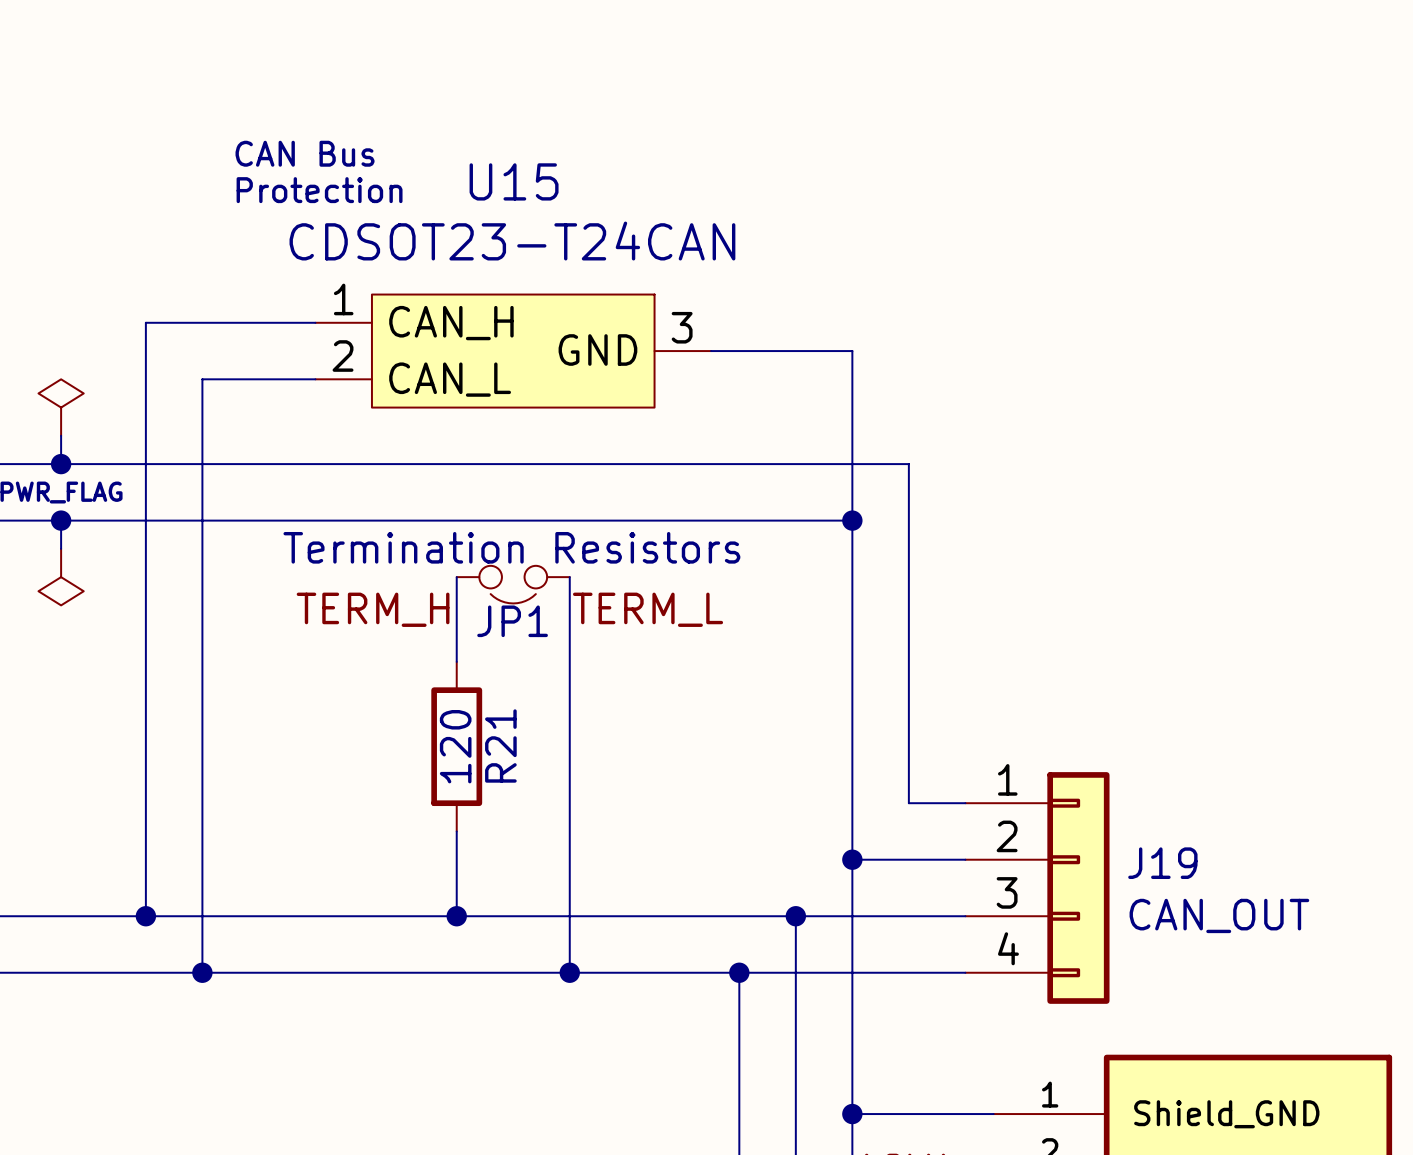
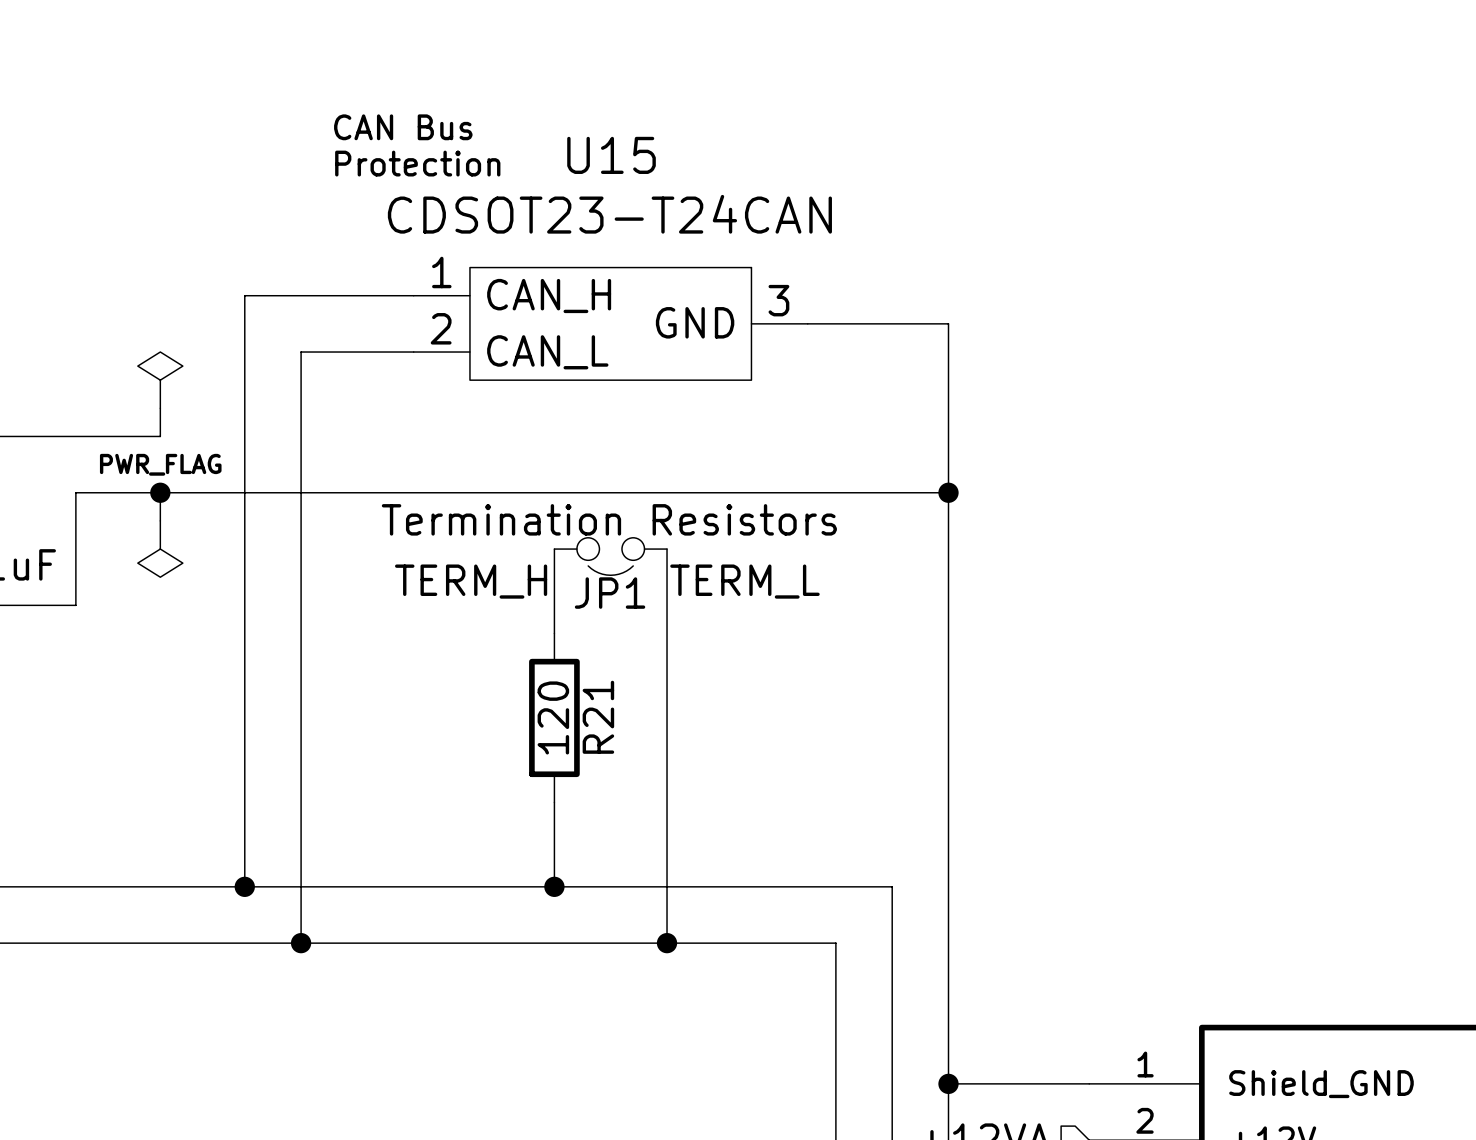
wire: (61, 464) (908, 464) (908, 803) (965, 803) -> none
junction: (61, 464) -> none
wire: (852, 859) (965, 859) -> none
junction: (852, 859) -> none
J19: CAN_OUT (1037, 887) -> none
wire: (795, 916) (965, 916) -> none
junction: (795, 916) -> none
wire: (739, 972) (965, 972) -> none
junction: (739, 972) -> none

